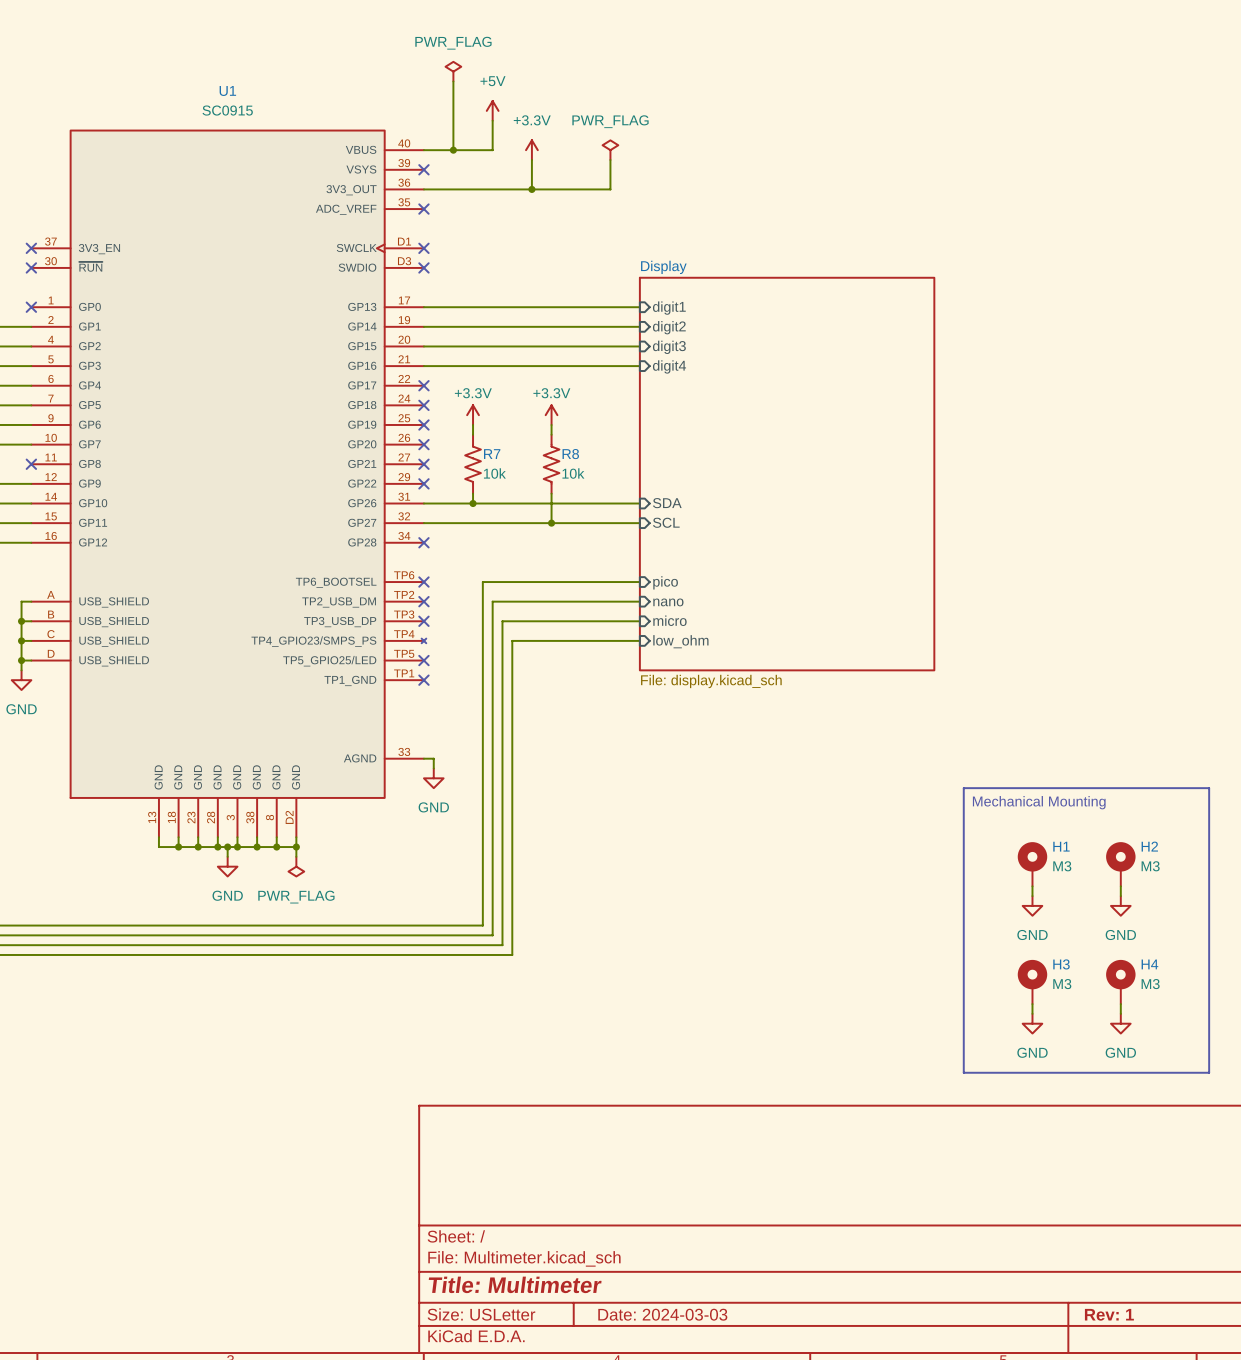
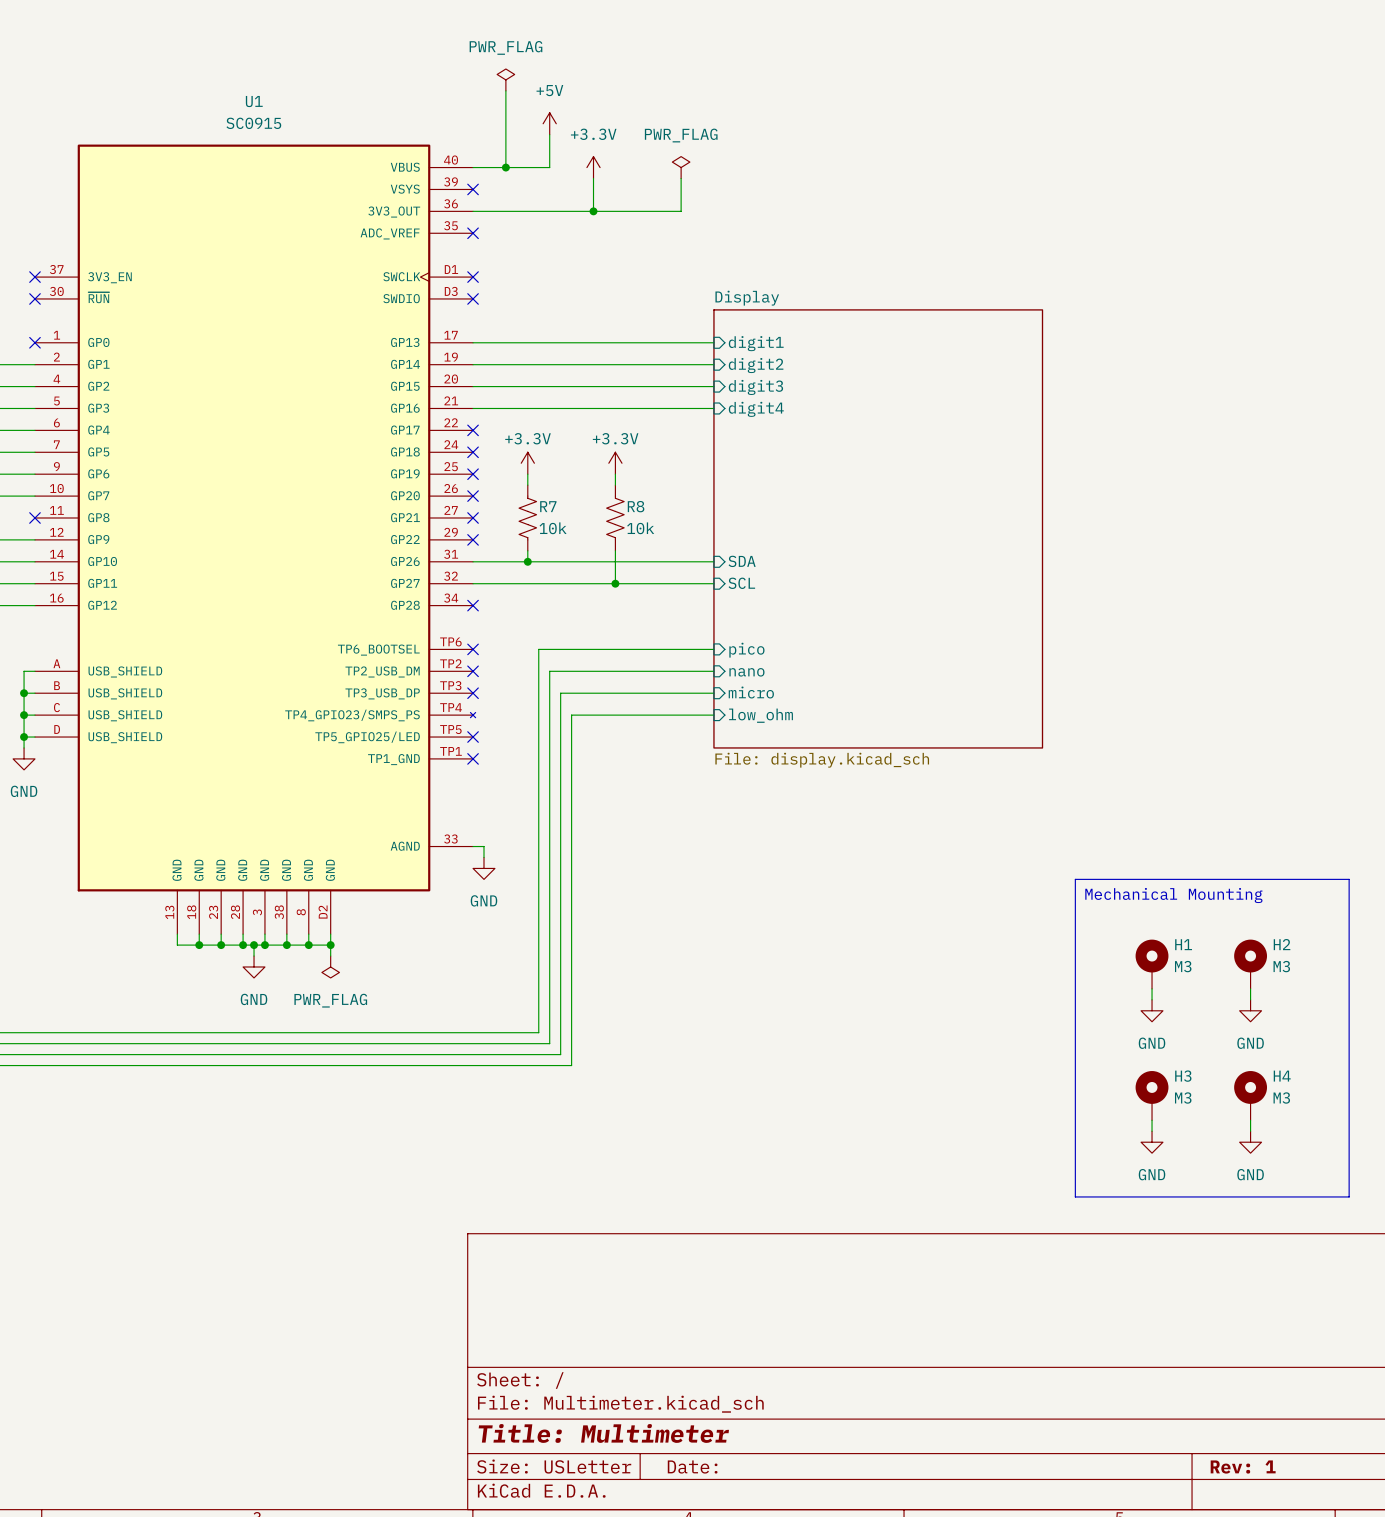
title block: Date: 2024-03-03 (662, 1314) -> Date: (692, 1467)

